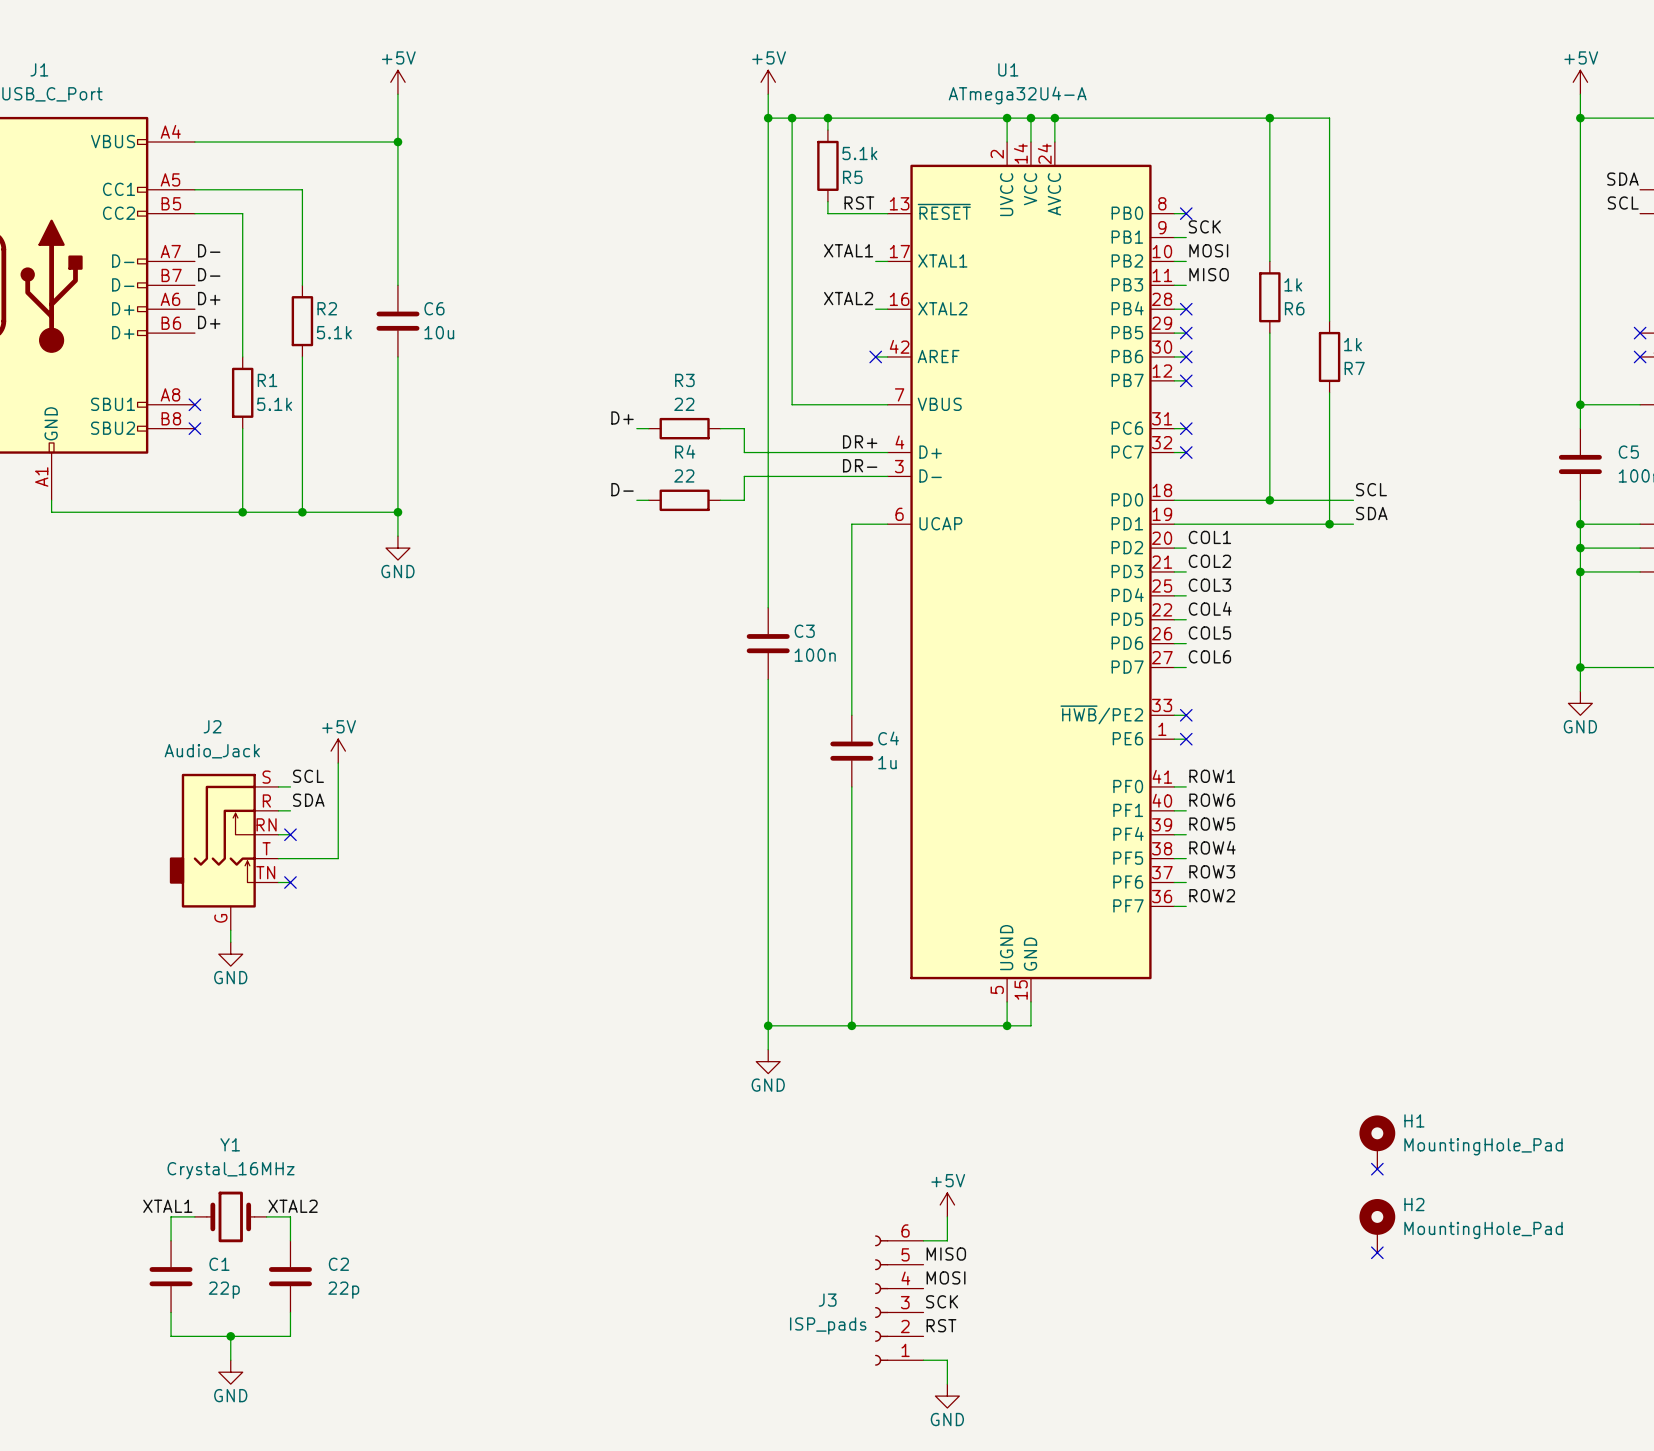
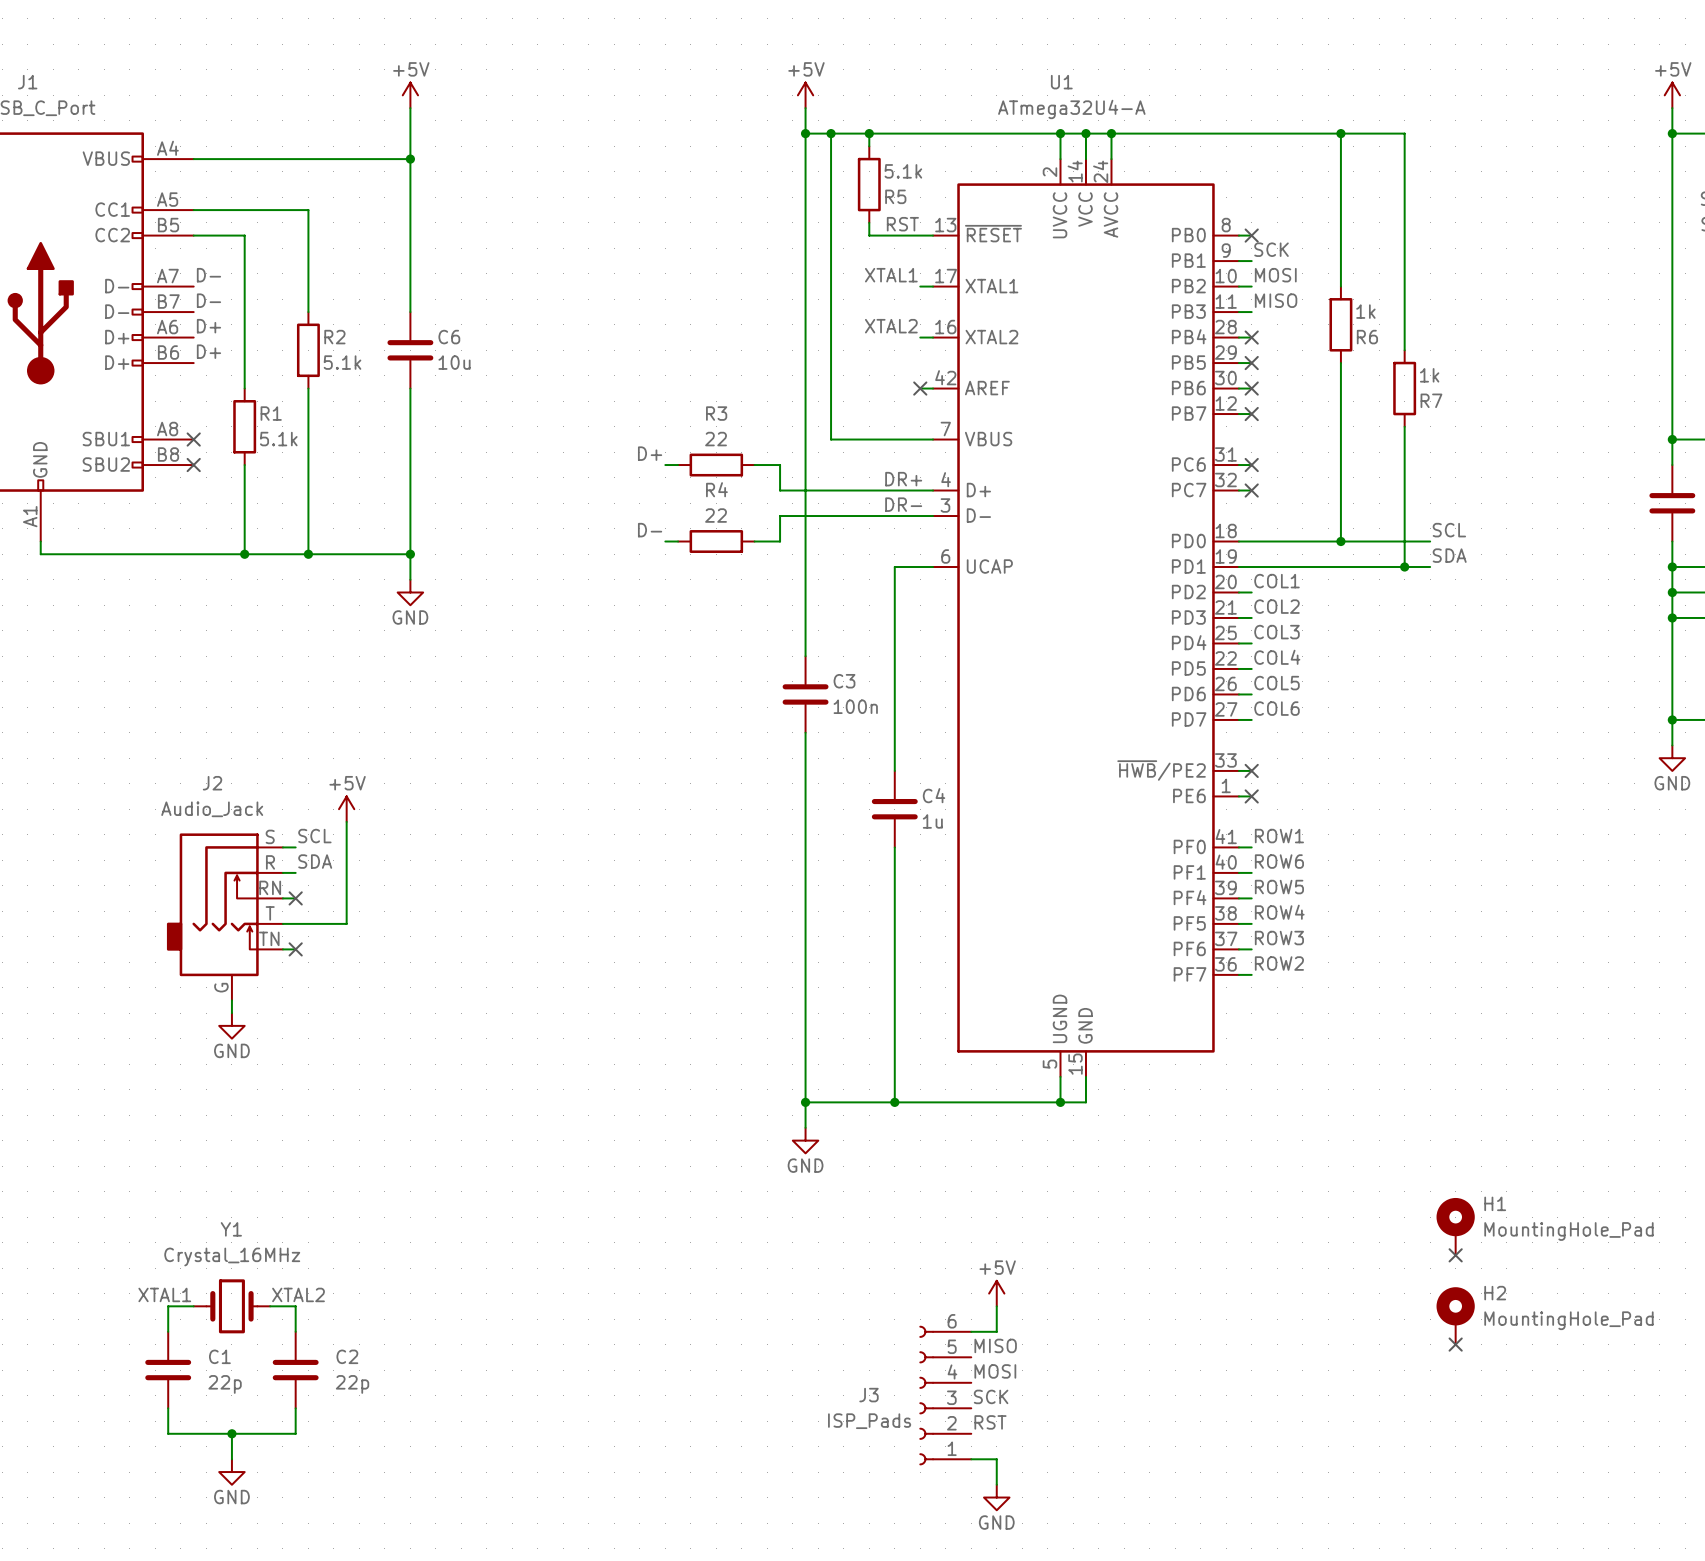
J3 value: ISP_pads (828, 1325) -> ISP_Pads (869, 1421)

